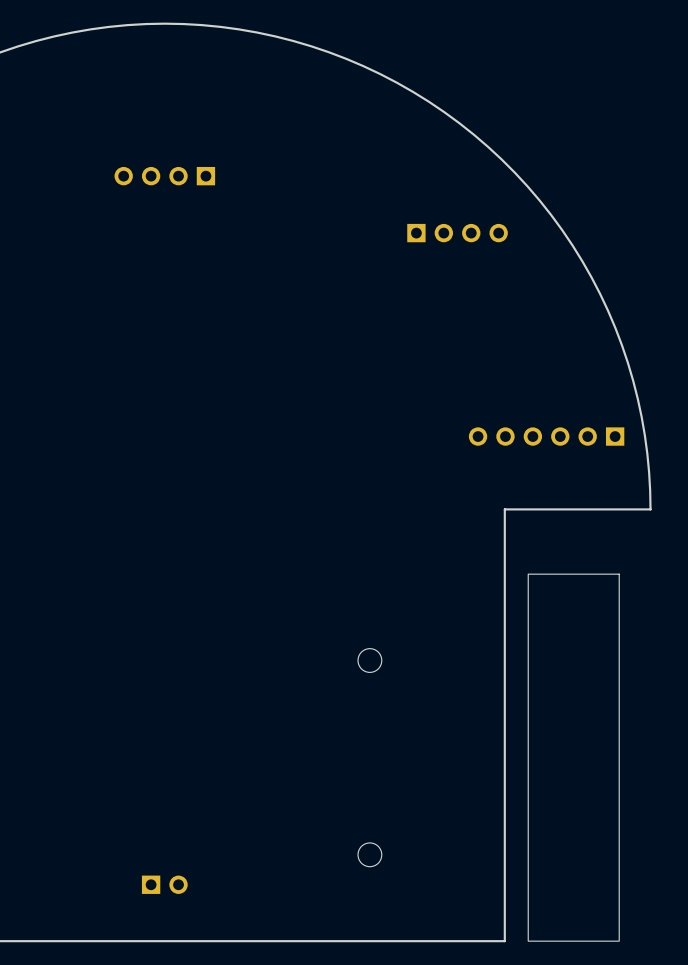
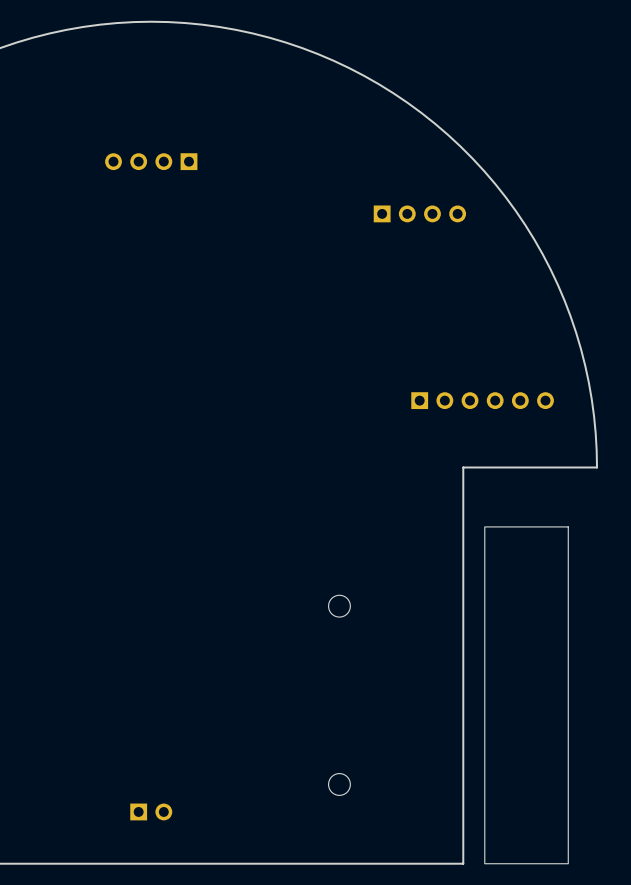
part rotation: 0° (546, 436) -> 180° (482, 400)

